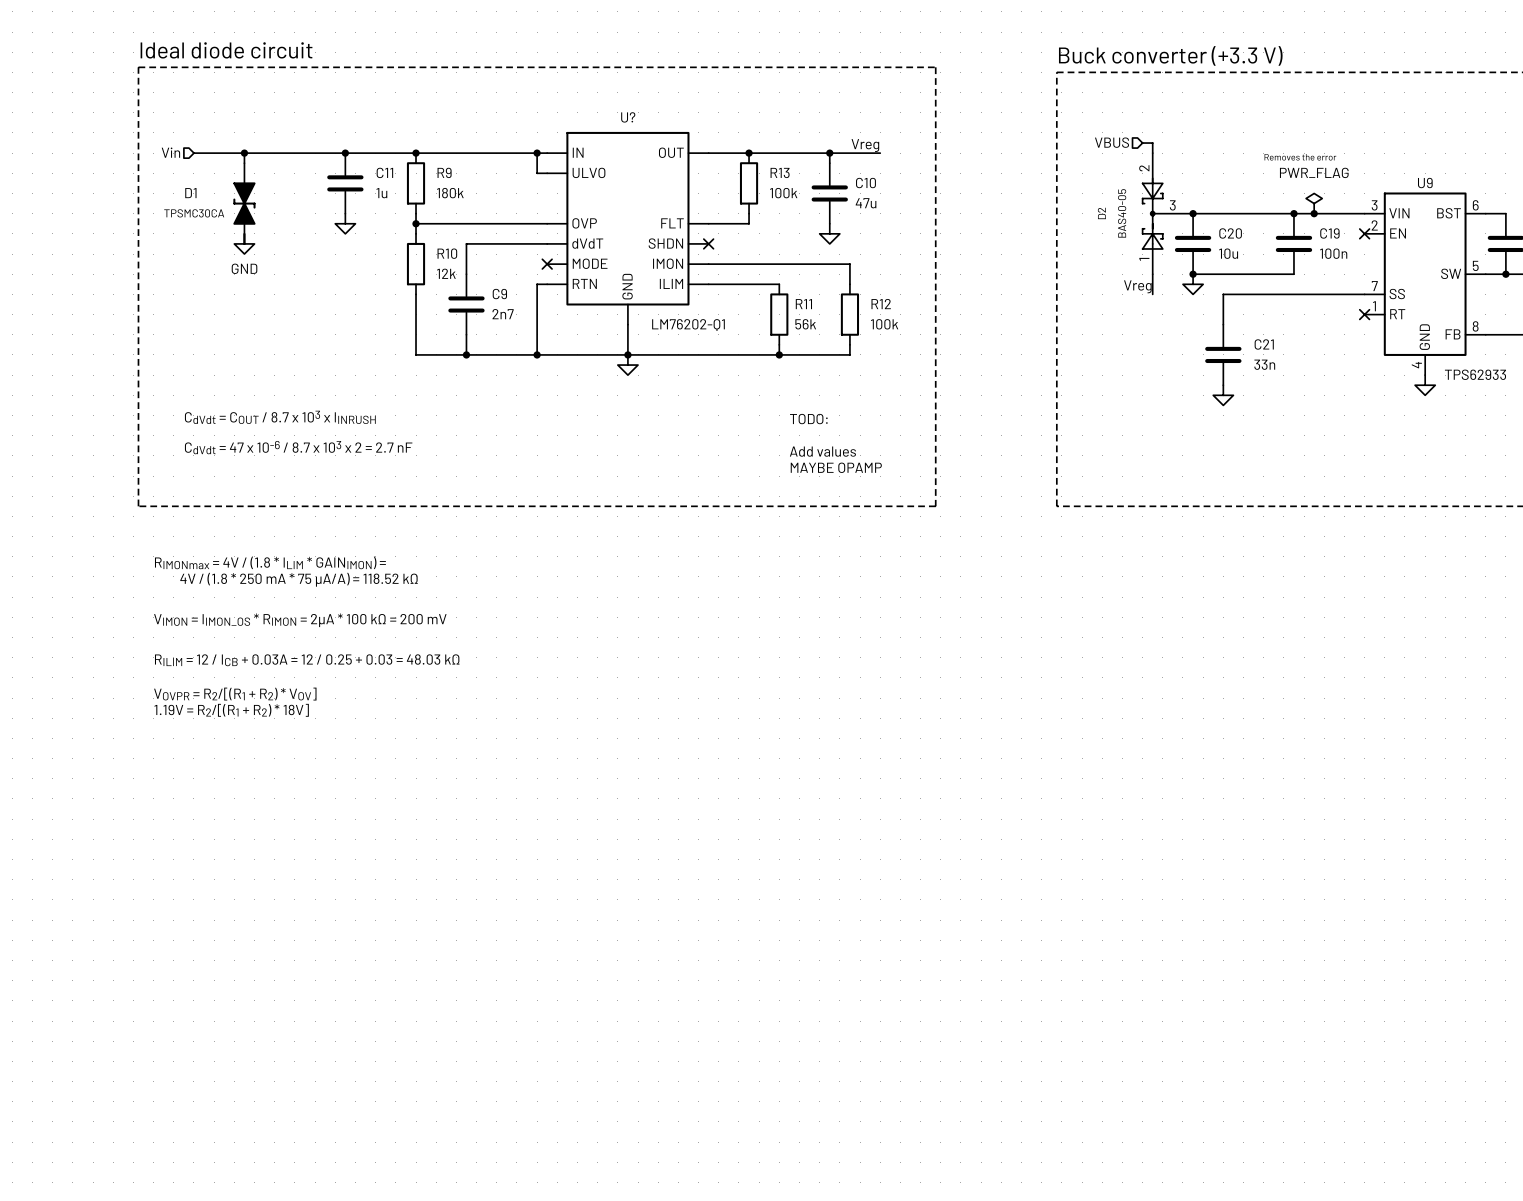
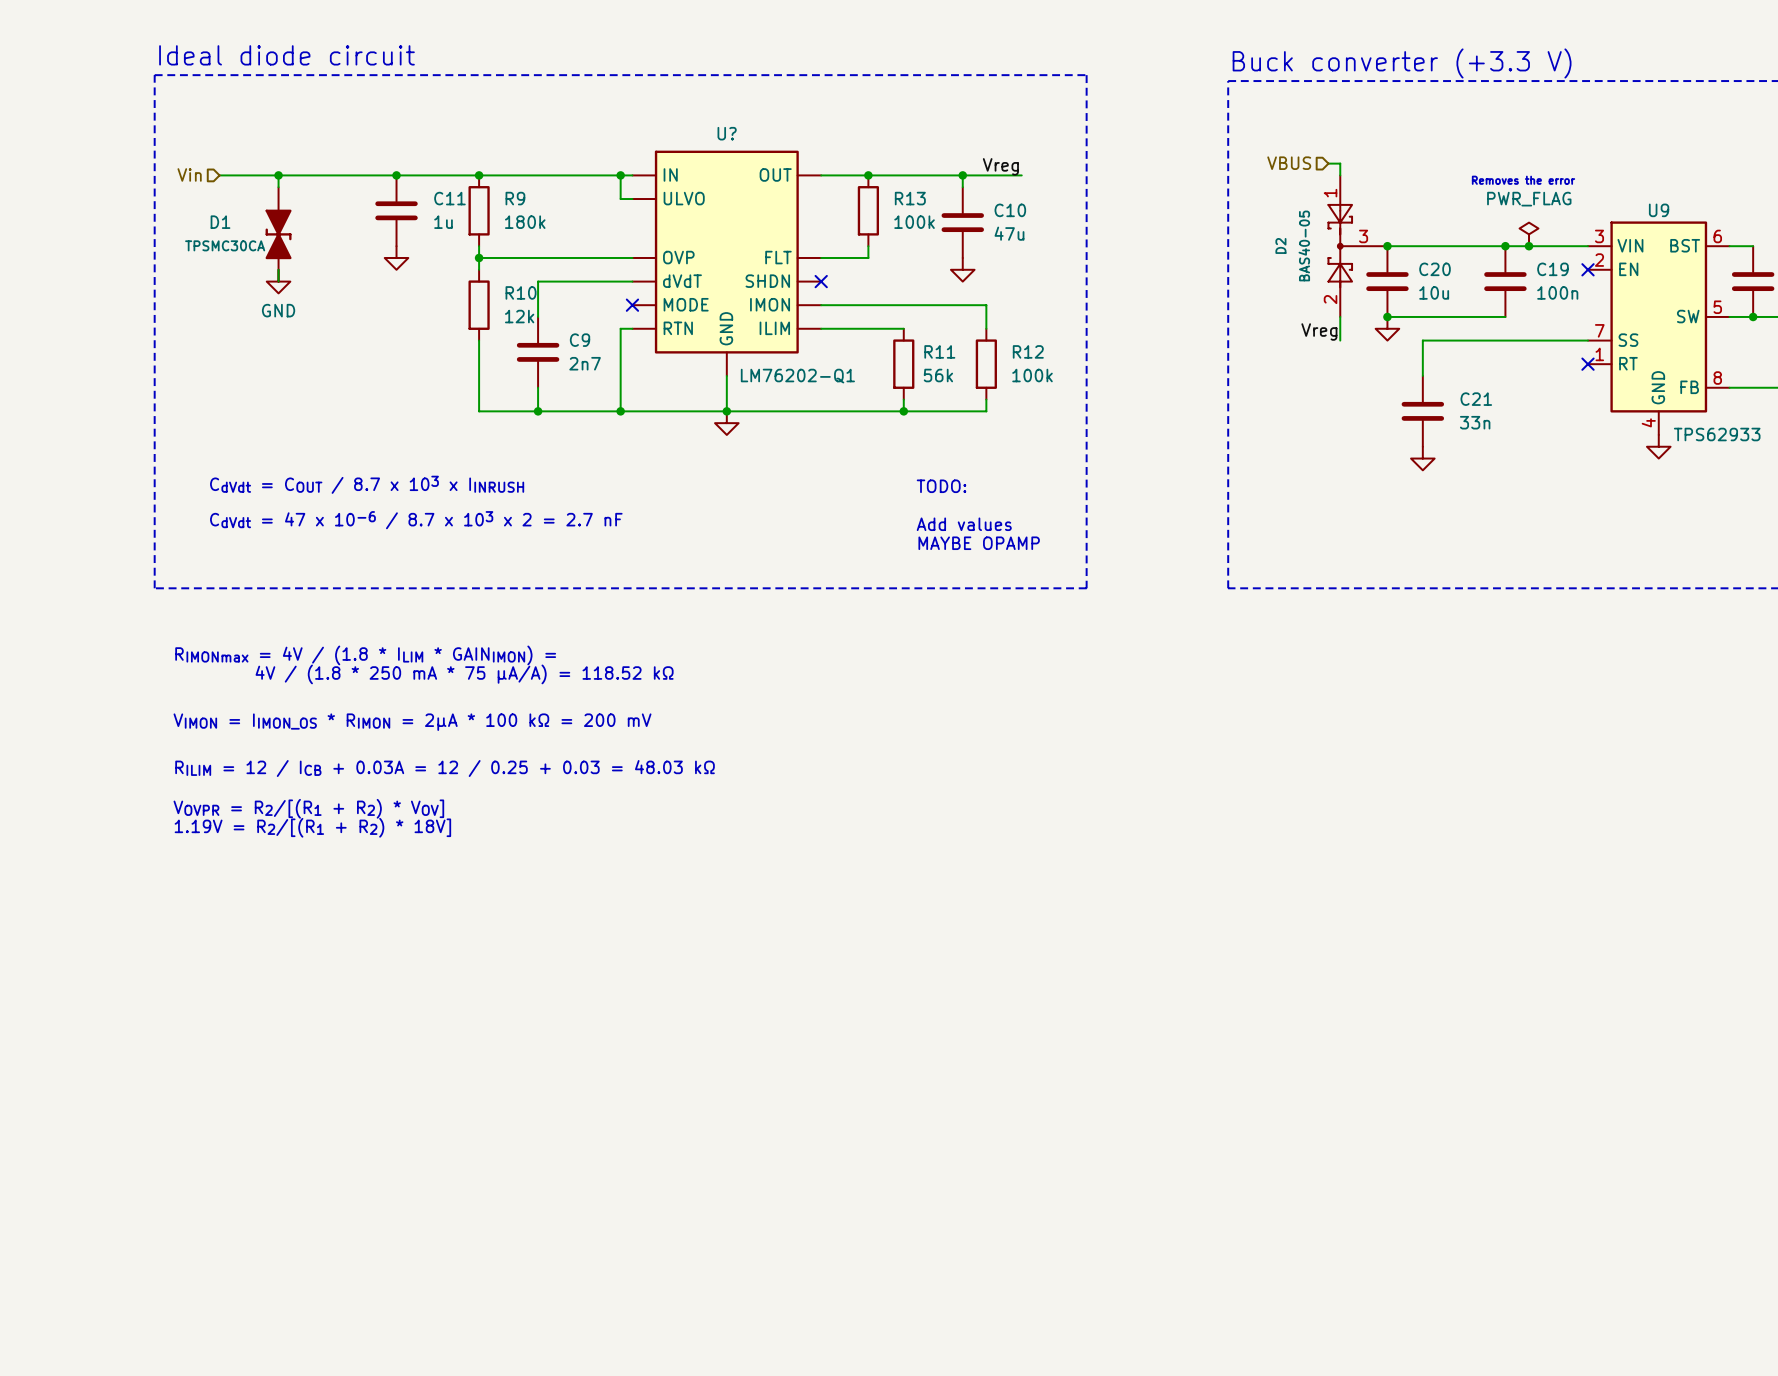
D2 flip: as is (1152, 213) -> up-down (1340, 246)

